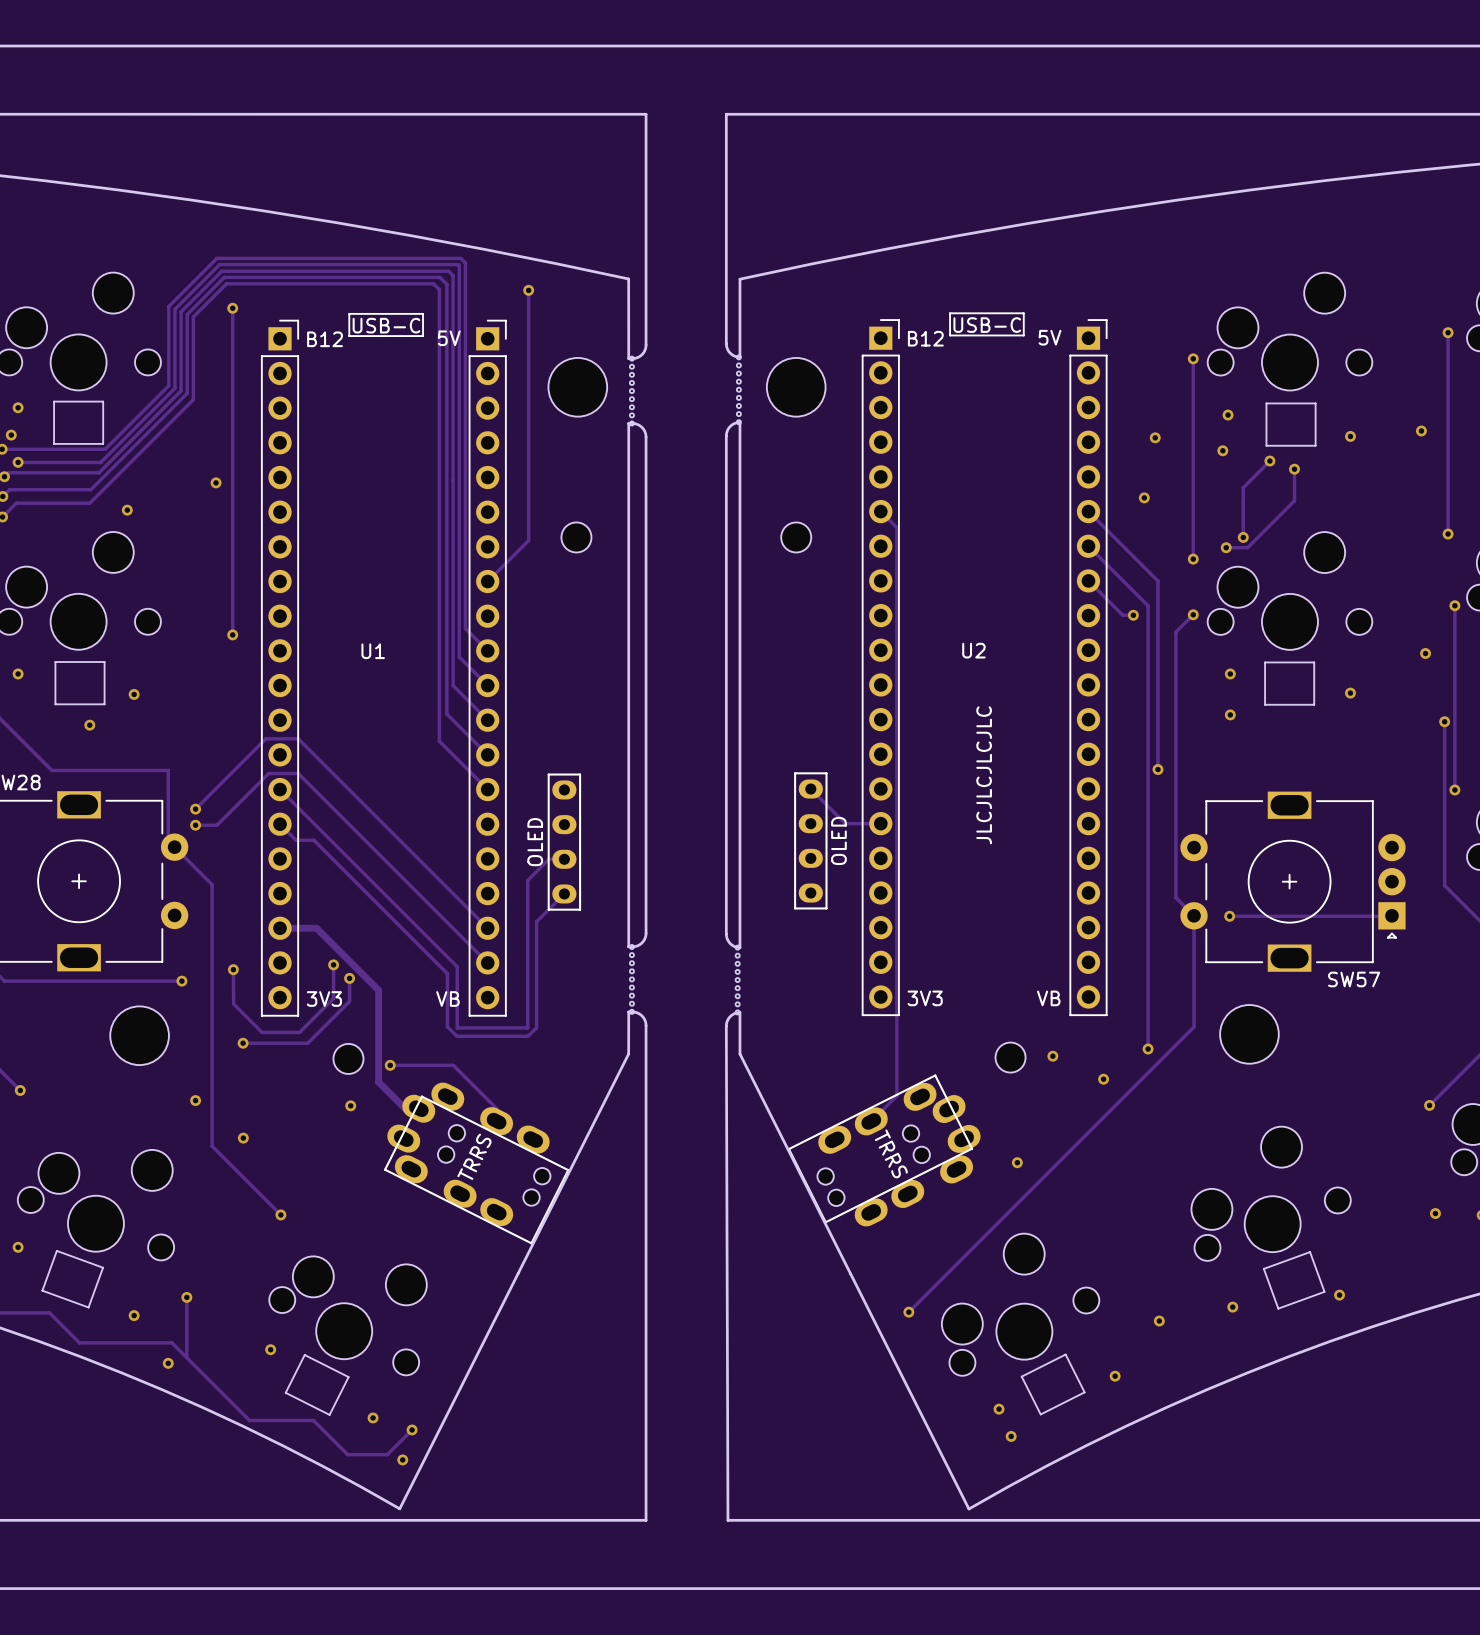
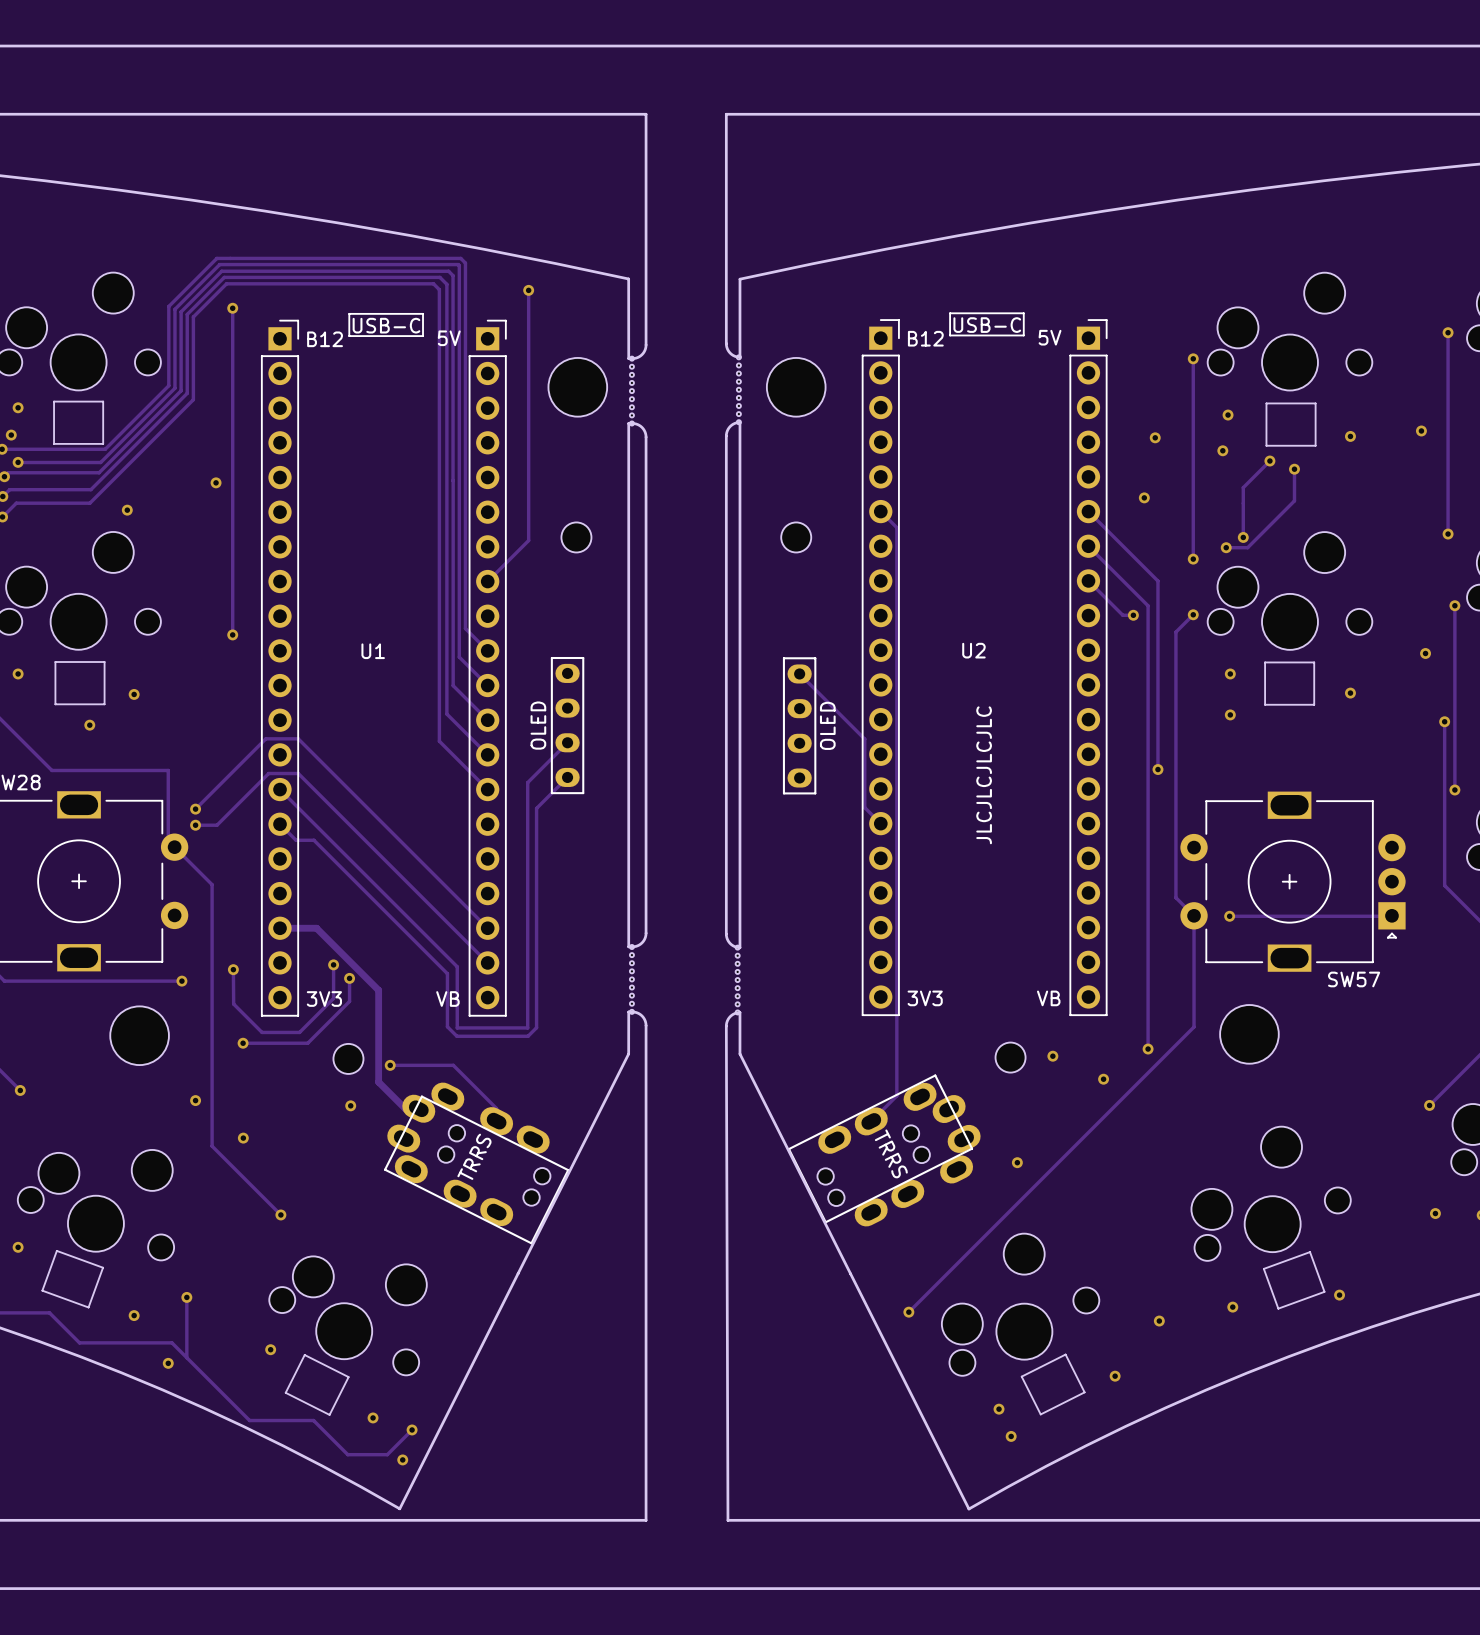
track: (810, 789) (845, 823) (880, 823) -> (799, 673) (864, 739) (864, 807) (880, 823)
part position: (810, 840) -> (799, 725)
part position: (564, 842) -> (567, 725)
track: (564, 859) (548, 859) (527, 880) -> (567, 742) (527, 782) (527, 880)
track: (564, 893) (536, 921) -> (567, 777) (536, 808) (536, 921)

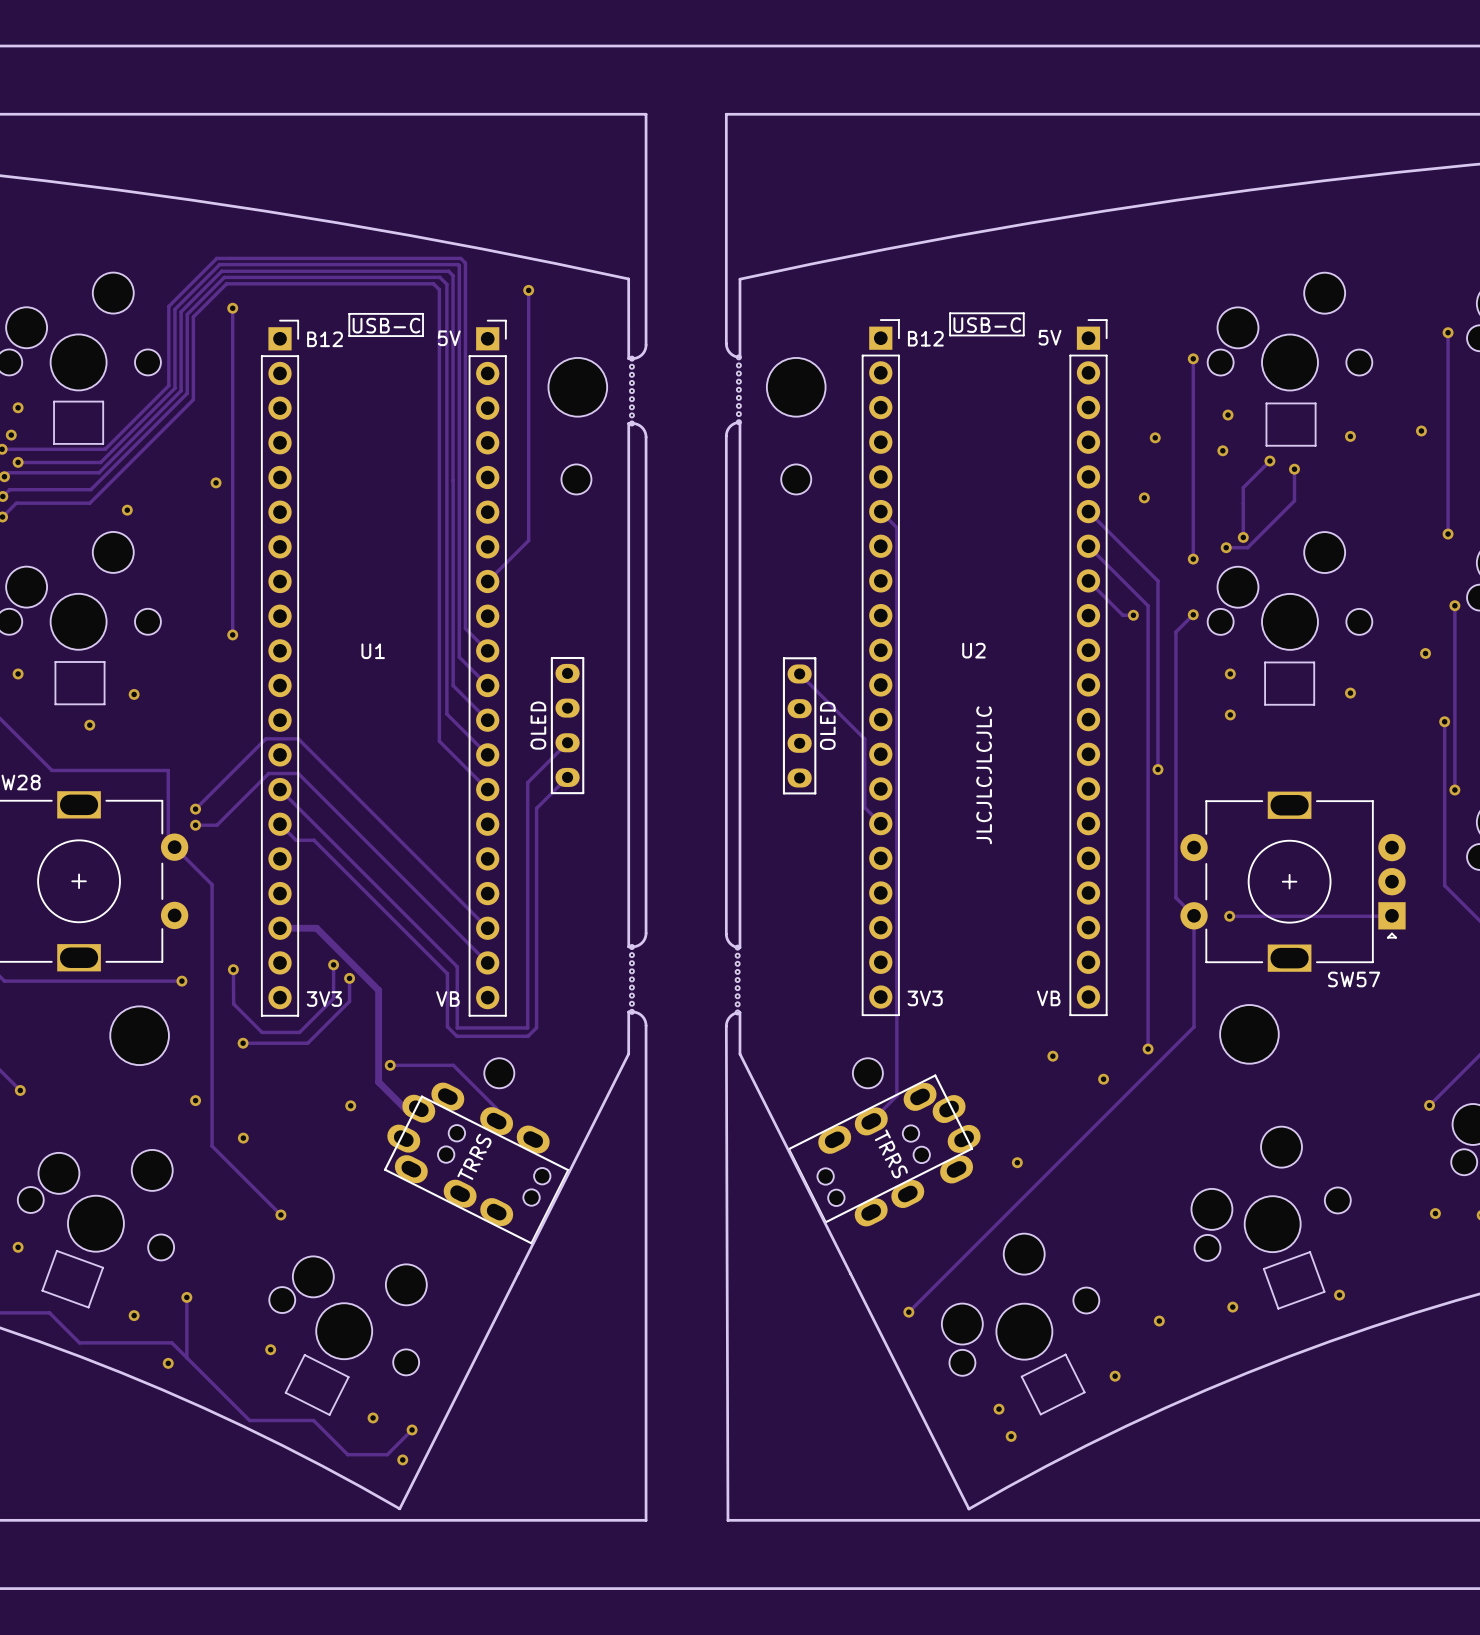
part position: (576, 537) -> (576, 479)
part position: (796, 537) -> (796, 479)
part position: (1010, 1057) -> (867, 1073)
part position: (348, 1058) -> (499, 1073)

